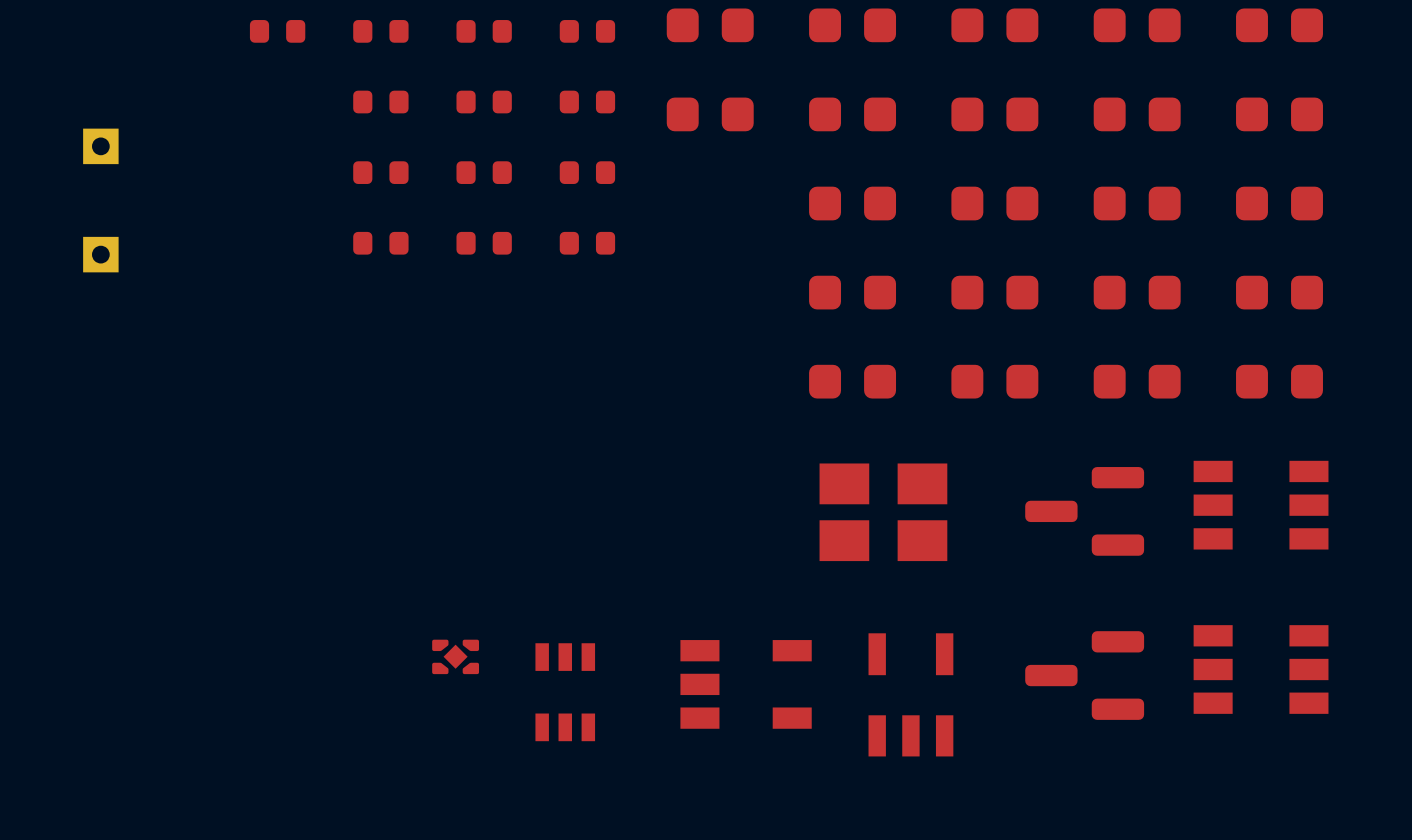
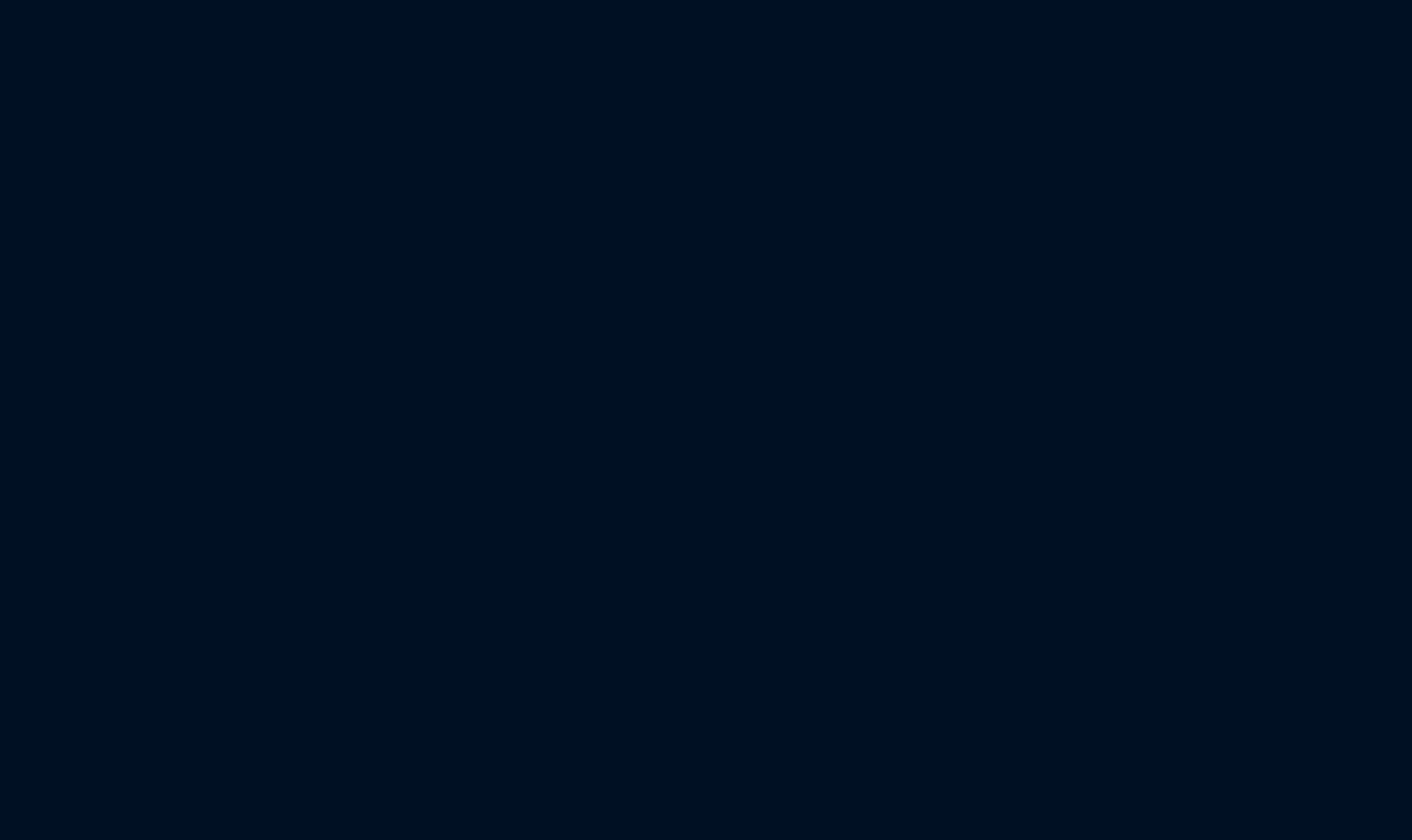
part: (710, 25) -> none
part: (852, 25) -> none
part: (994, 25) -> none
part: (1137, 25) -> none
part: (1279, 25) -> none
part: (277, 31) -> none
part: (380, 31) -> none
part: (484, 31) -> none
part: (587, 31) -> none
part: (380, 102) -> none
part: (484, 102) -> none
part: (587, 102) -> none
part: (710, 114) -> none
part: (852, 114) -> none
part: (994, 114) -> none
part: (1137, 114) -> none
part: (1279, 114) -> none
part: (100, 146) -> none
part: (380, 172) -> none
part: (484, 172) -> none
part: (587, 172) -> none
part: (852, 203) -> none
part: (994, 203) -> none
part: (1137, 203) -> none
part: (1279, 203) -> none
part: (380, 243) -> none
part: (484, 243) -> none
part: (587, 243) -> none
part: (100, 254) -> none
part: (852, 292) -> none
part: (994, 292) -> none
part: (1137, 292) -> none
part: (1279, 292) -> none
part: (852, 381) -> none
part: (994, 381) -> none
part: (1137, 381) -> none
part: (1279, 381) -> none
part: (1261, 505) -> none
part: (1084, 511) -> none
part: (883, 512) -> none
part: (455, 656) -> none
part: (1261, 669) -> none
part: (1084, 675) -> none
part: (746, 684) -> none
part: (565, 692) -> none
part: (910, 694) -> none

